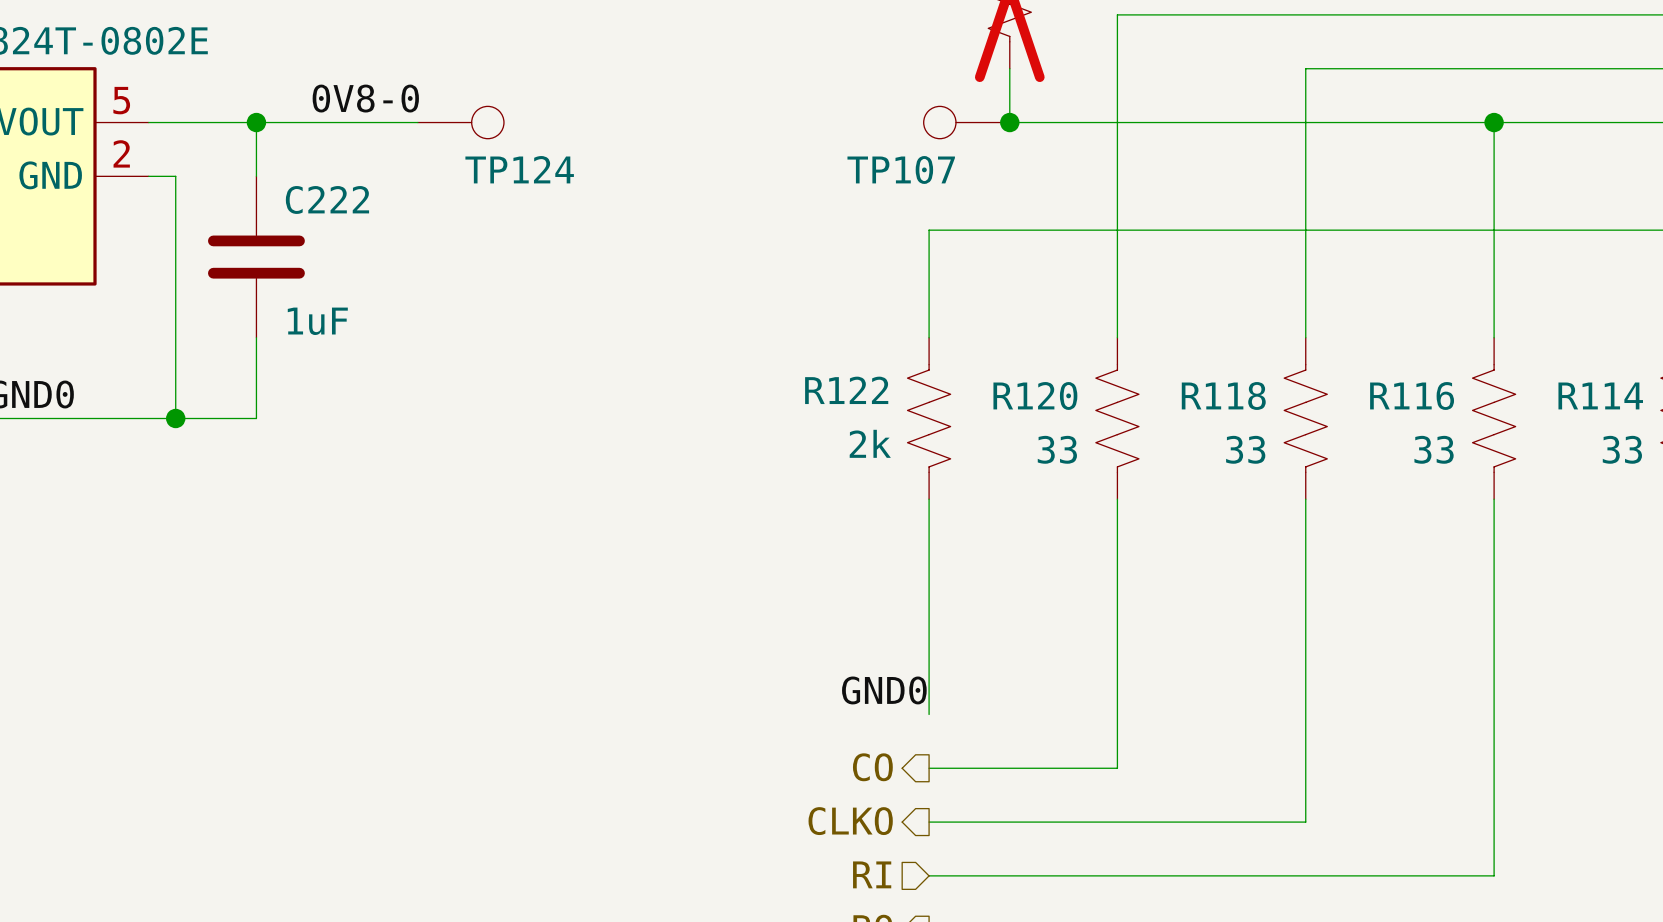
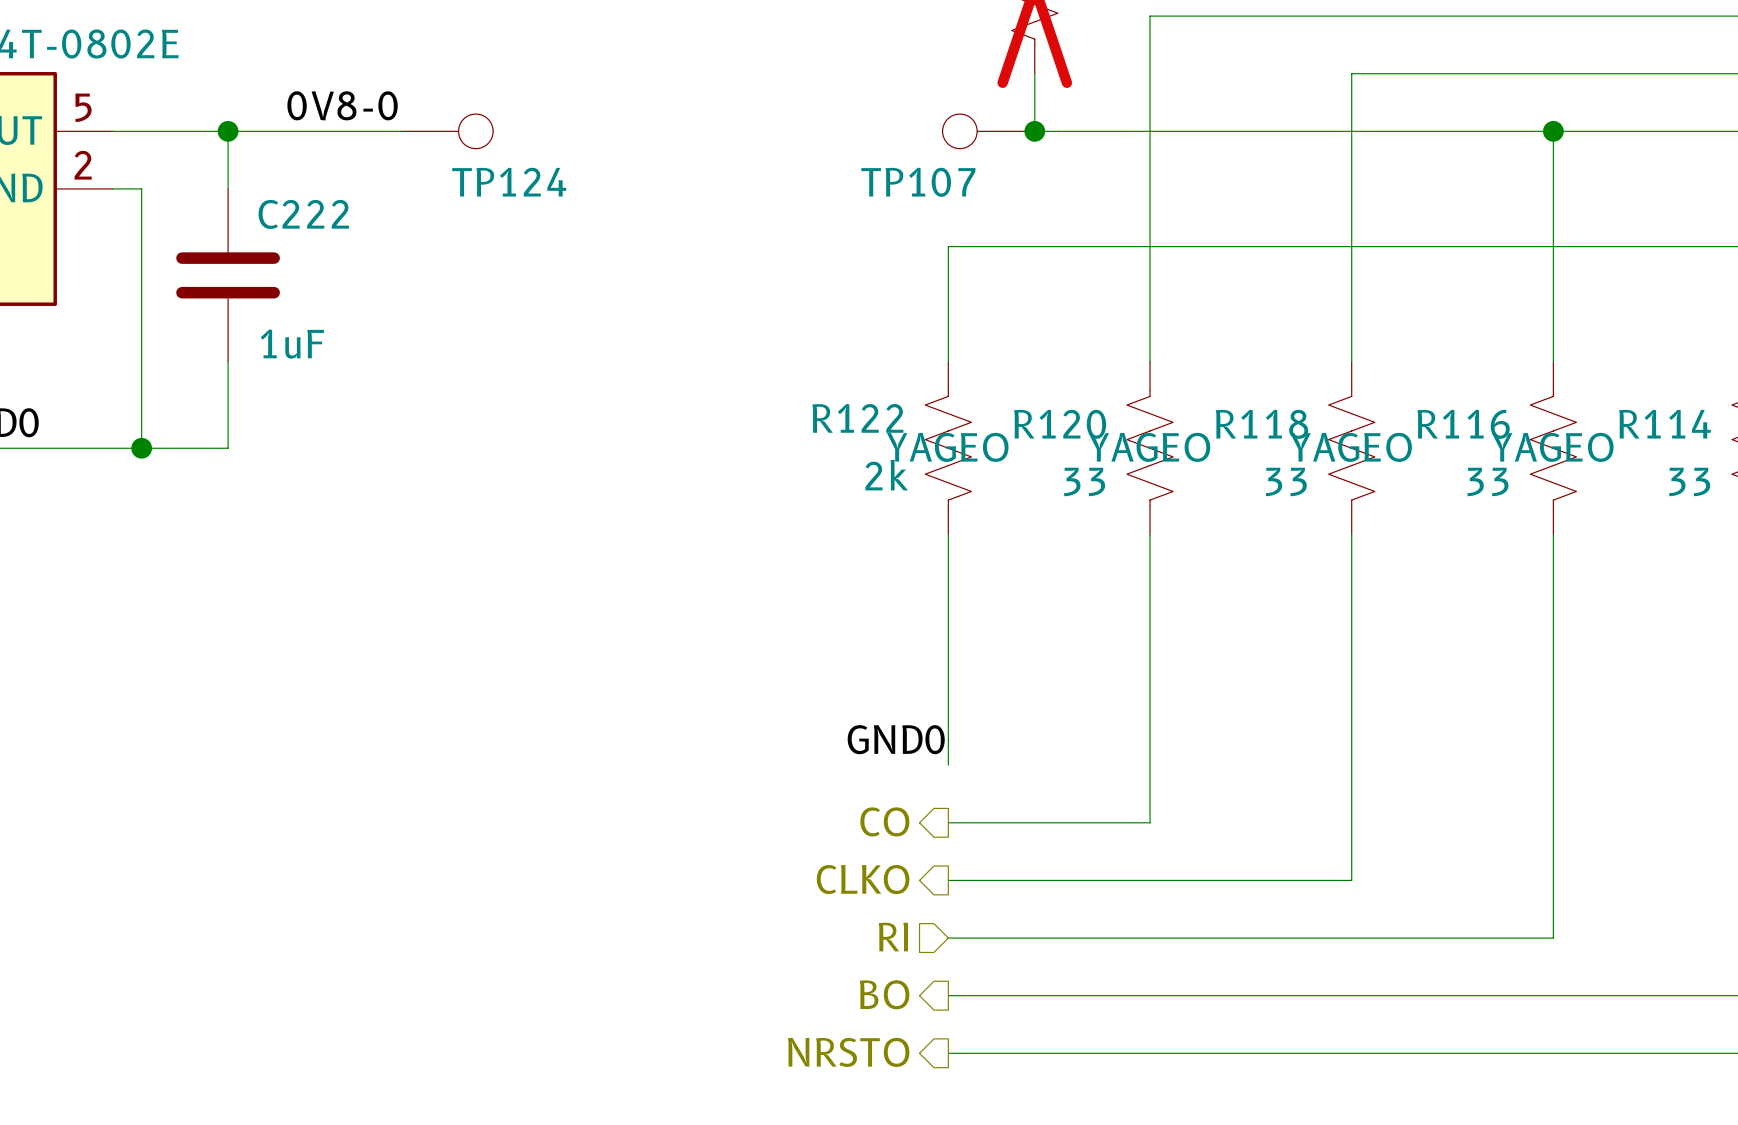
R122 text: none -> YAGEO (947, 447)
R120 text: none -> YAGEO (1149, 447)
R118 text: none -> YAGEO (1351, 447)
R116 text: none -> YAGEO (1552, 447)

